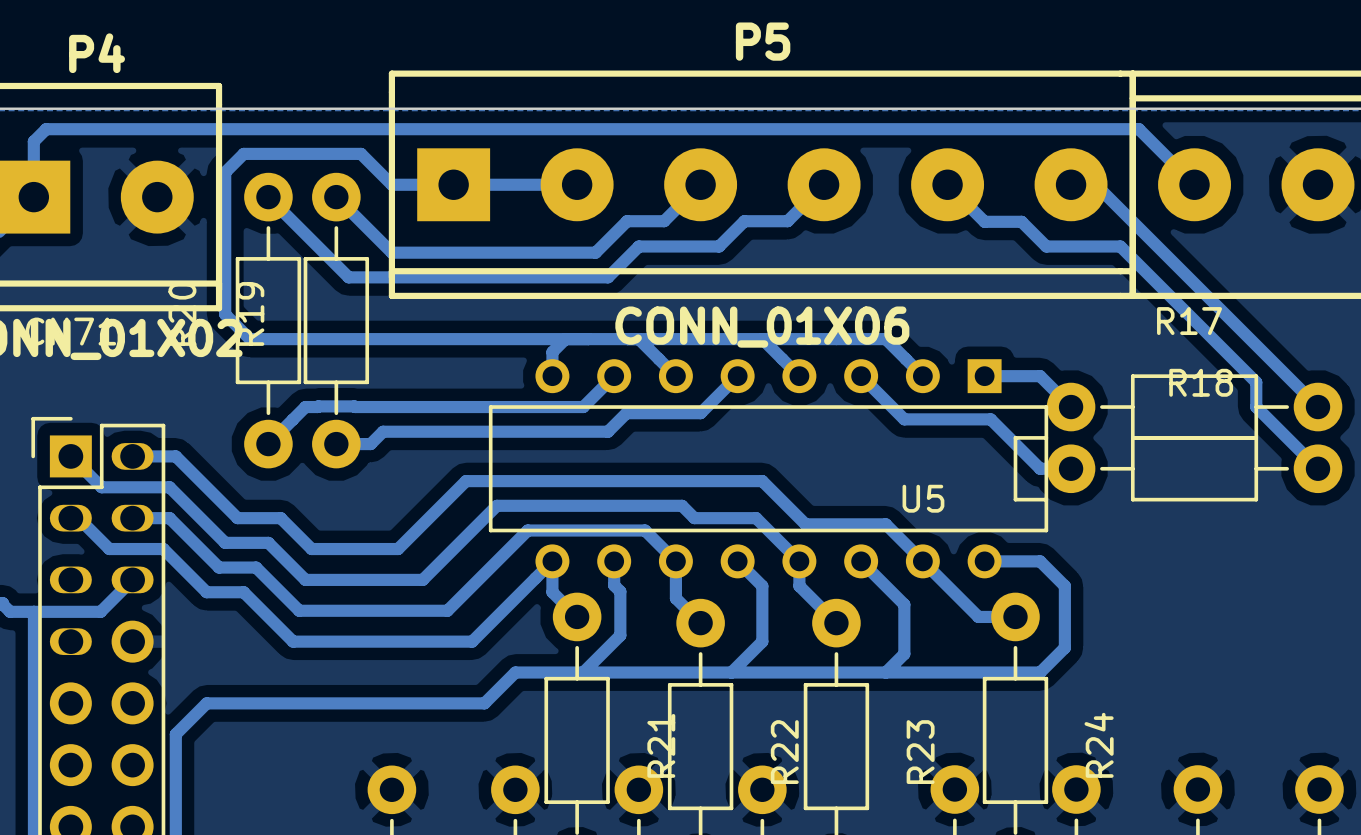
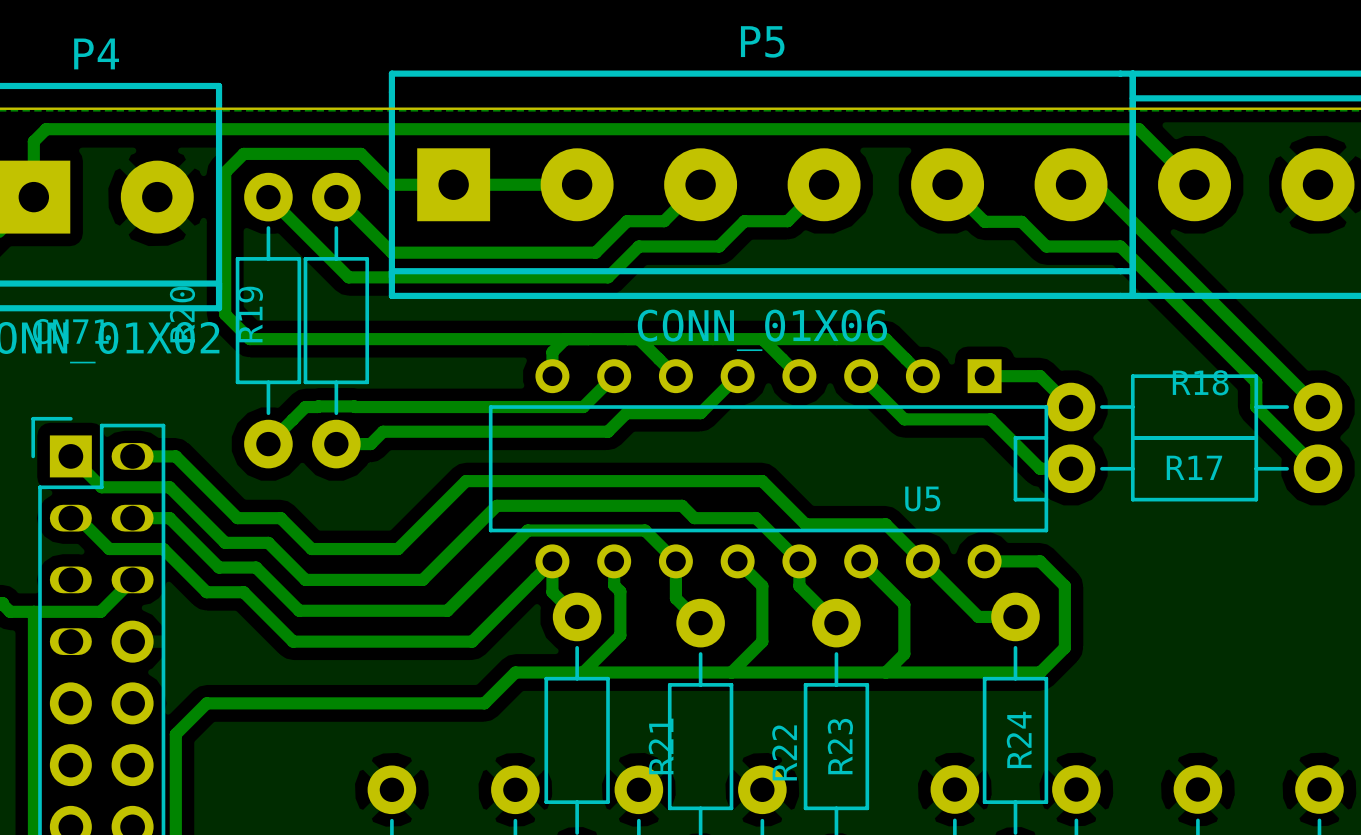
R17 name position: R17 (1189, 321) -> R17 (1194, 467)
R24 name position: R24 (1099, 745) -> R24 (1019, 739)
R23 name position: R23 (920, 752) -> R23 (840, 746)

